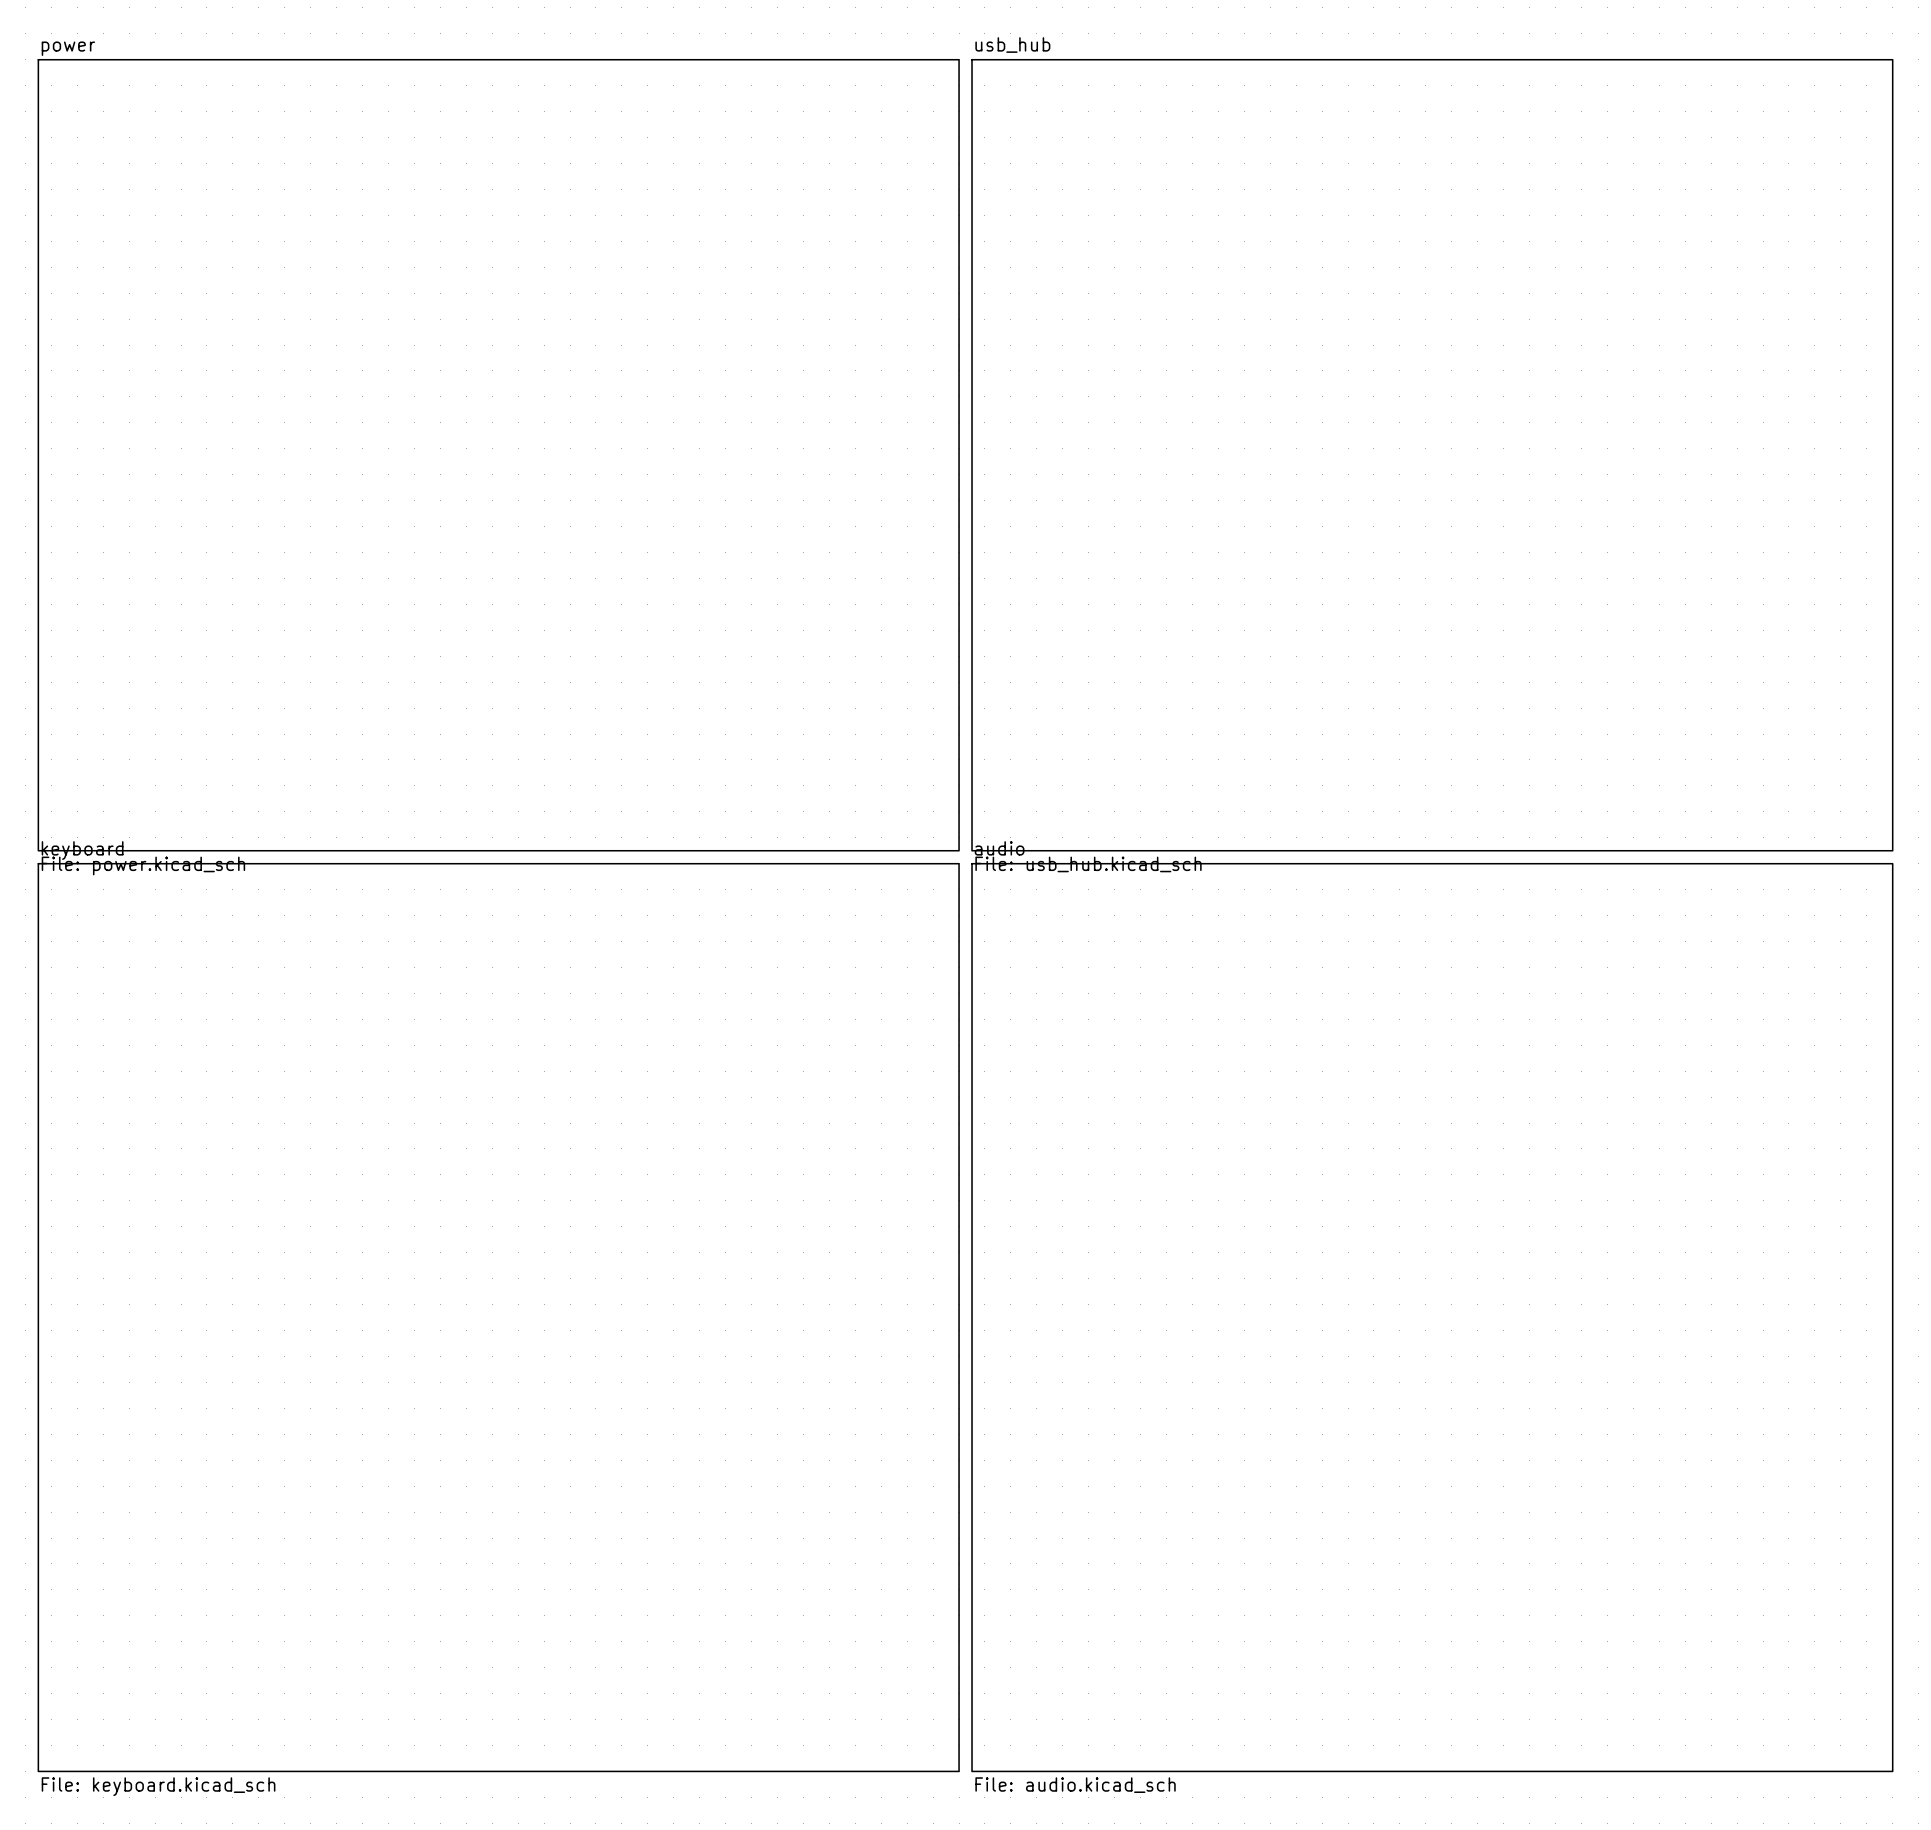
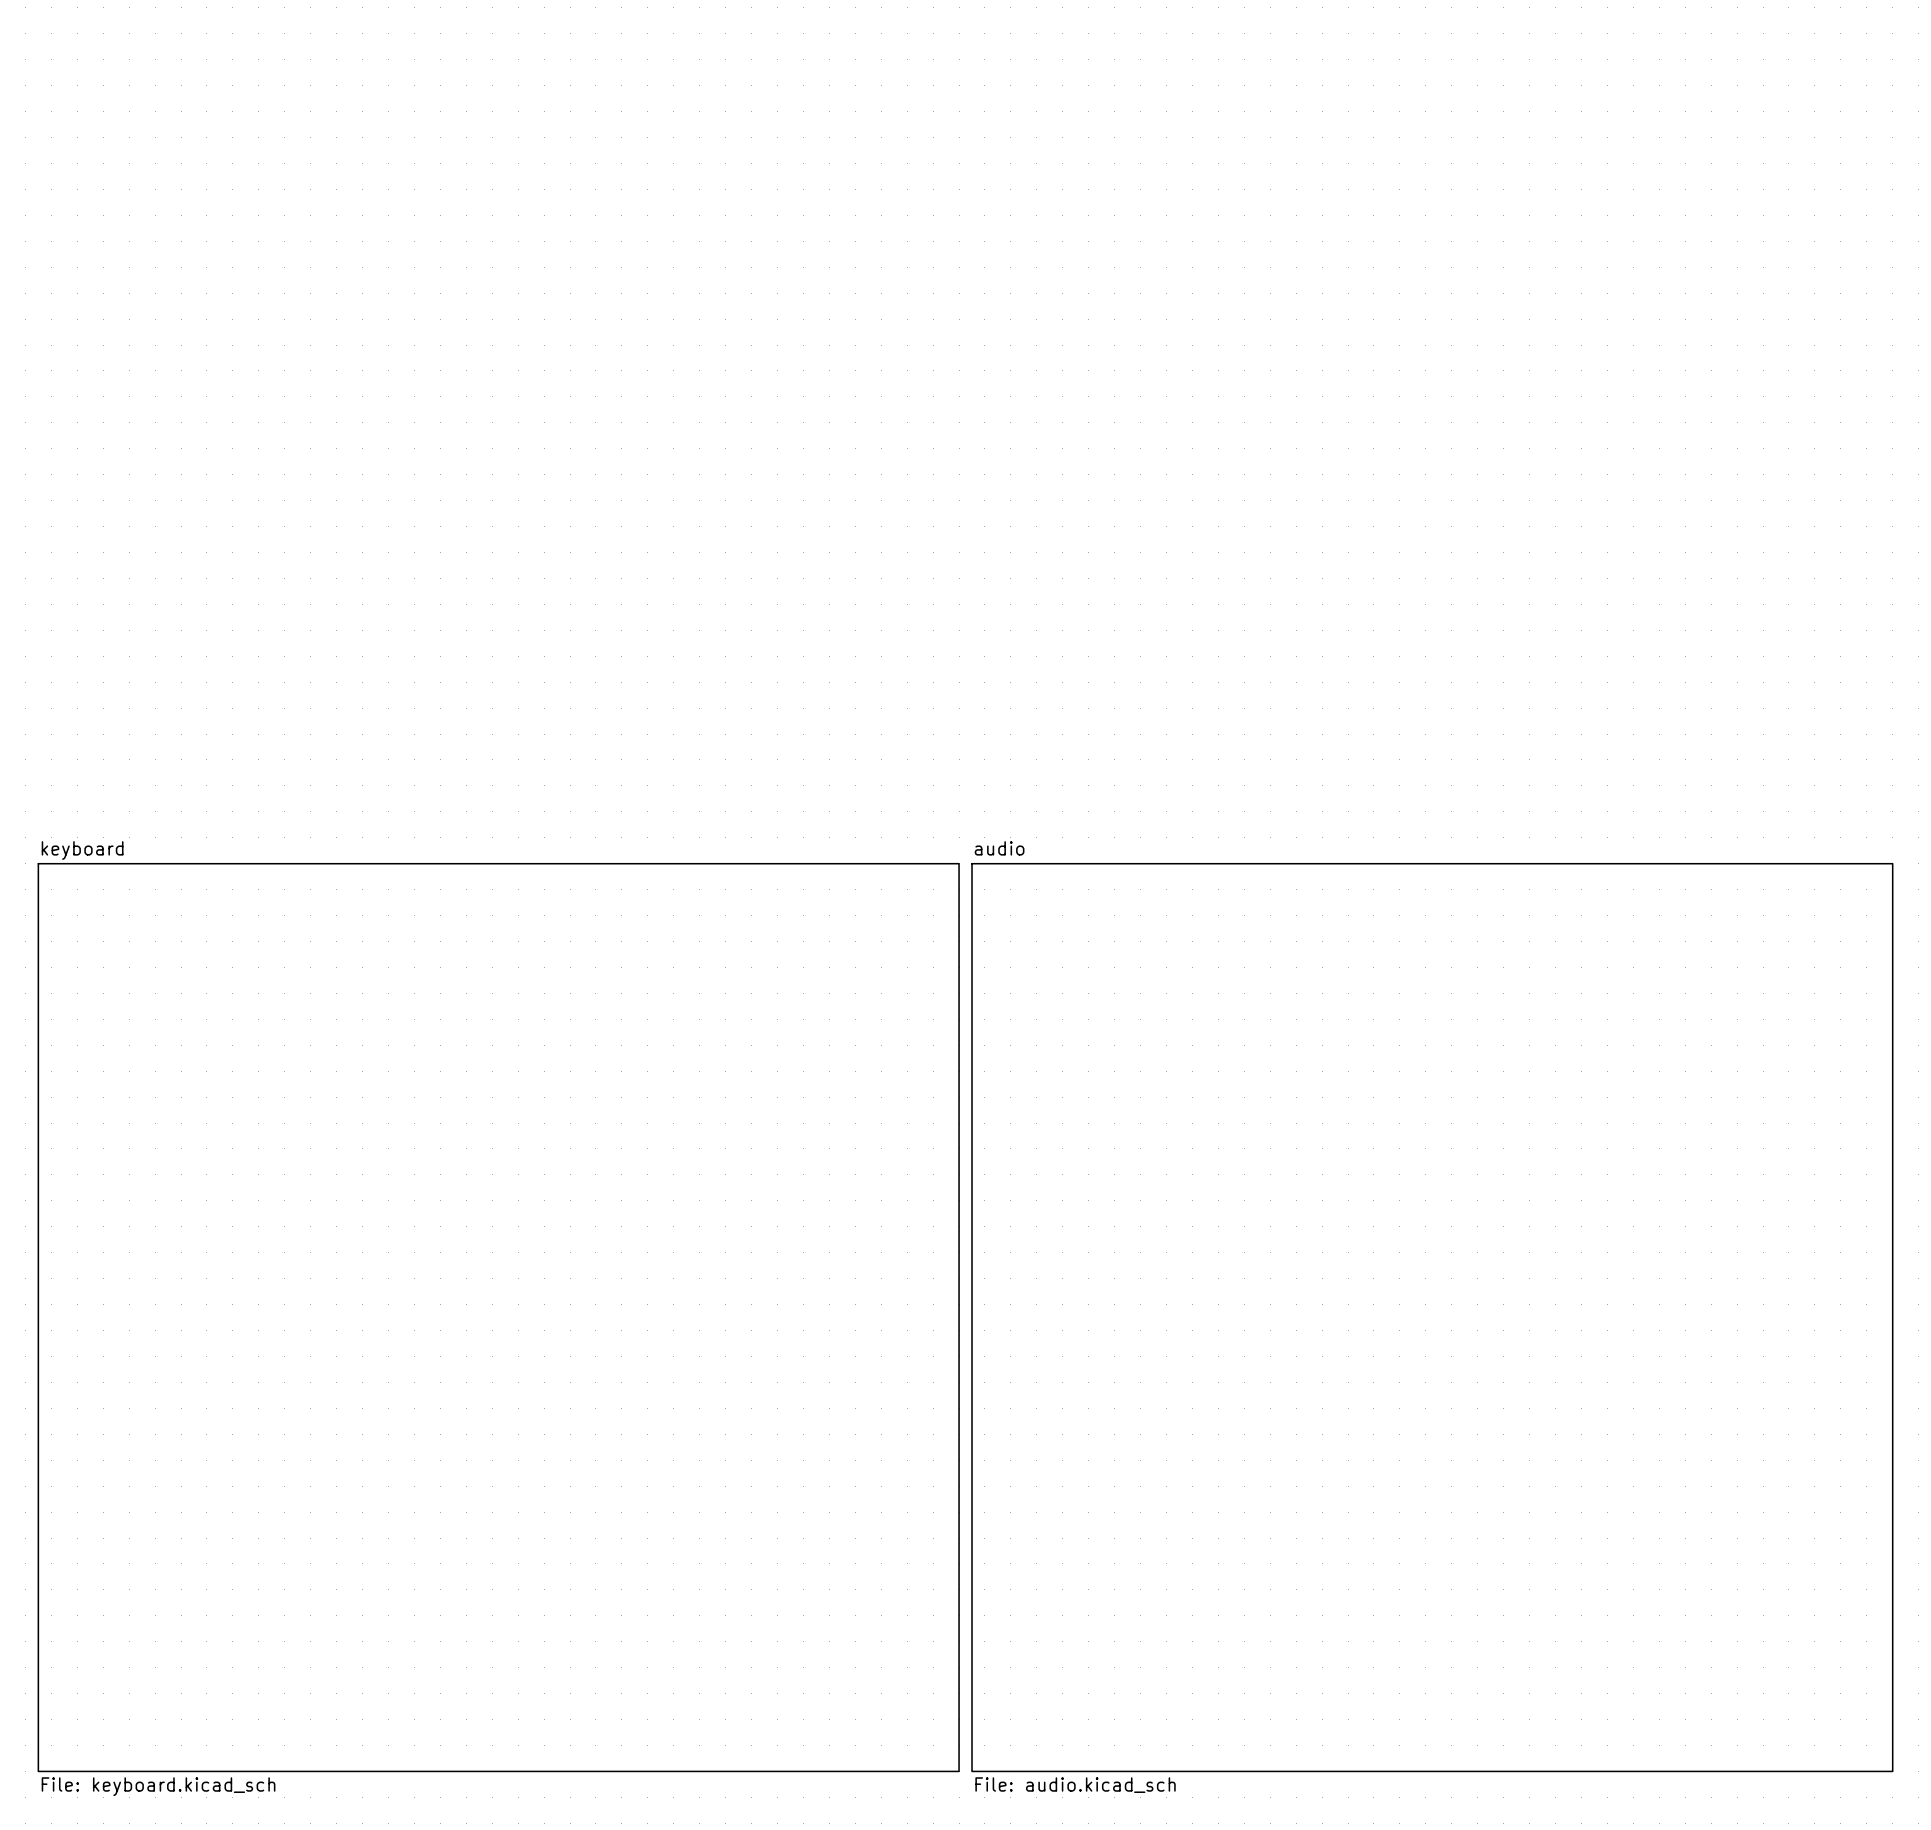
sheet power: File: power.kicad_sch (498, 455) -> none
sheet usb_hub: File: usb_hub.kicad_sch (1432, 455) -> none

